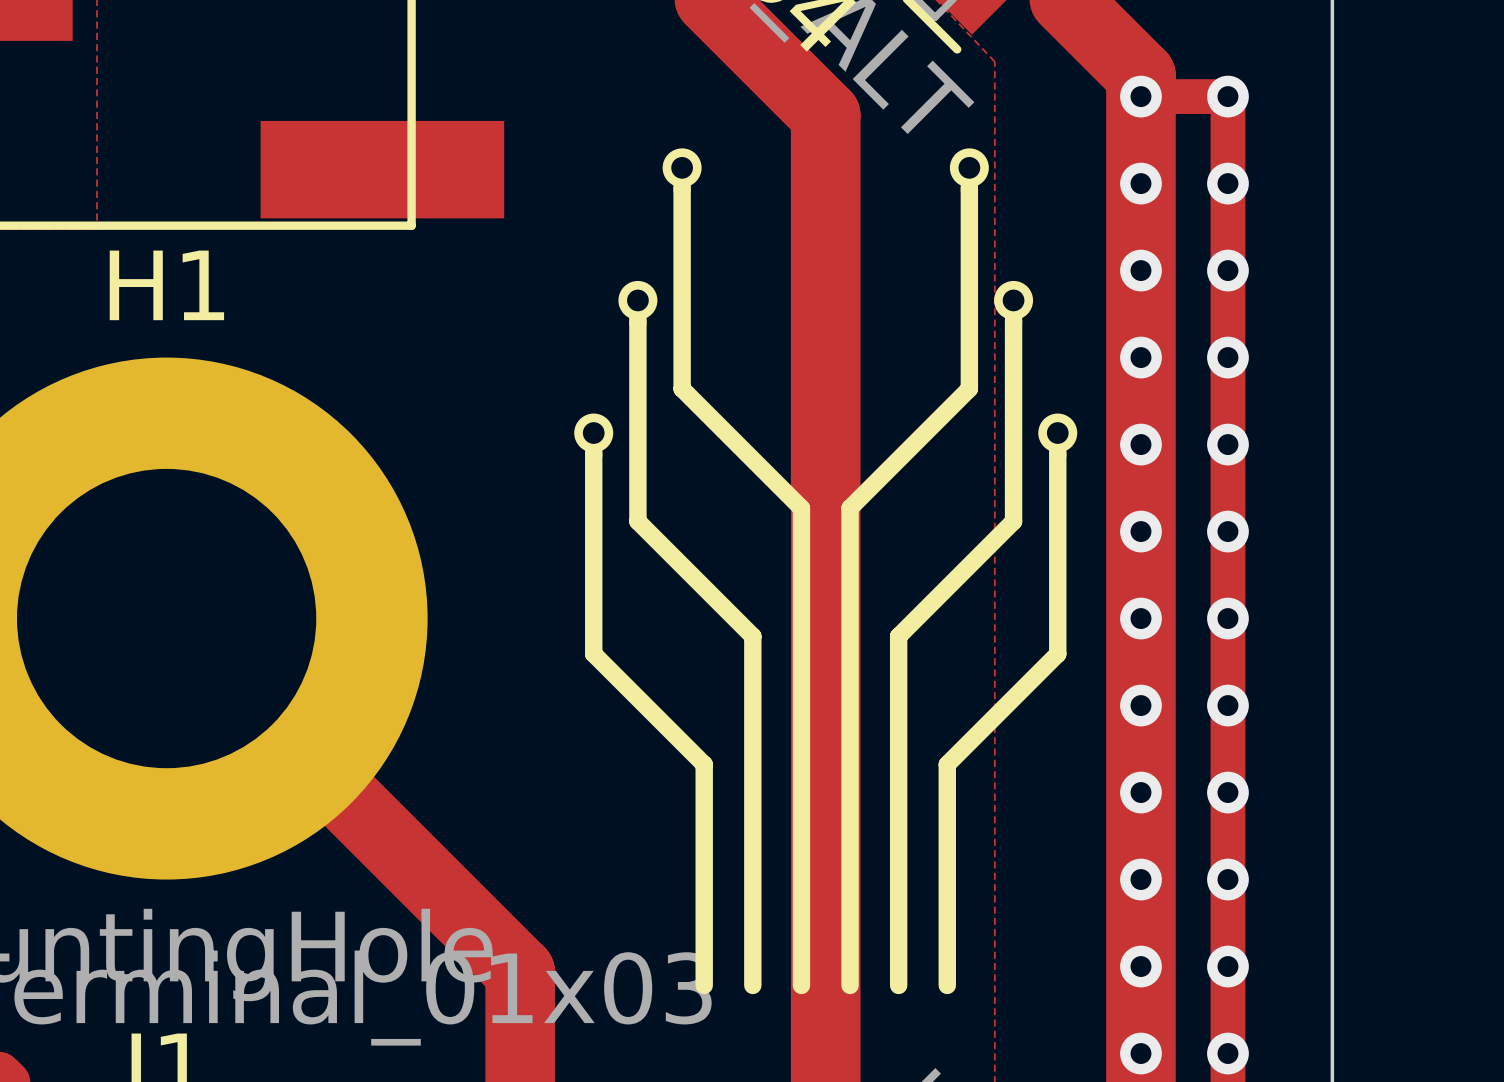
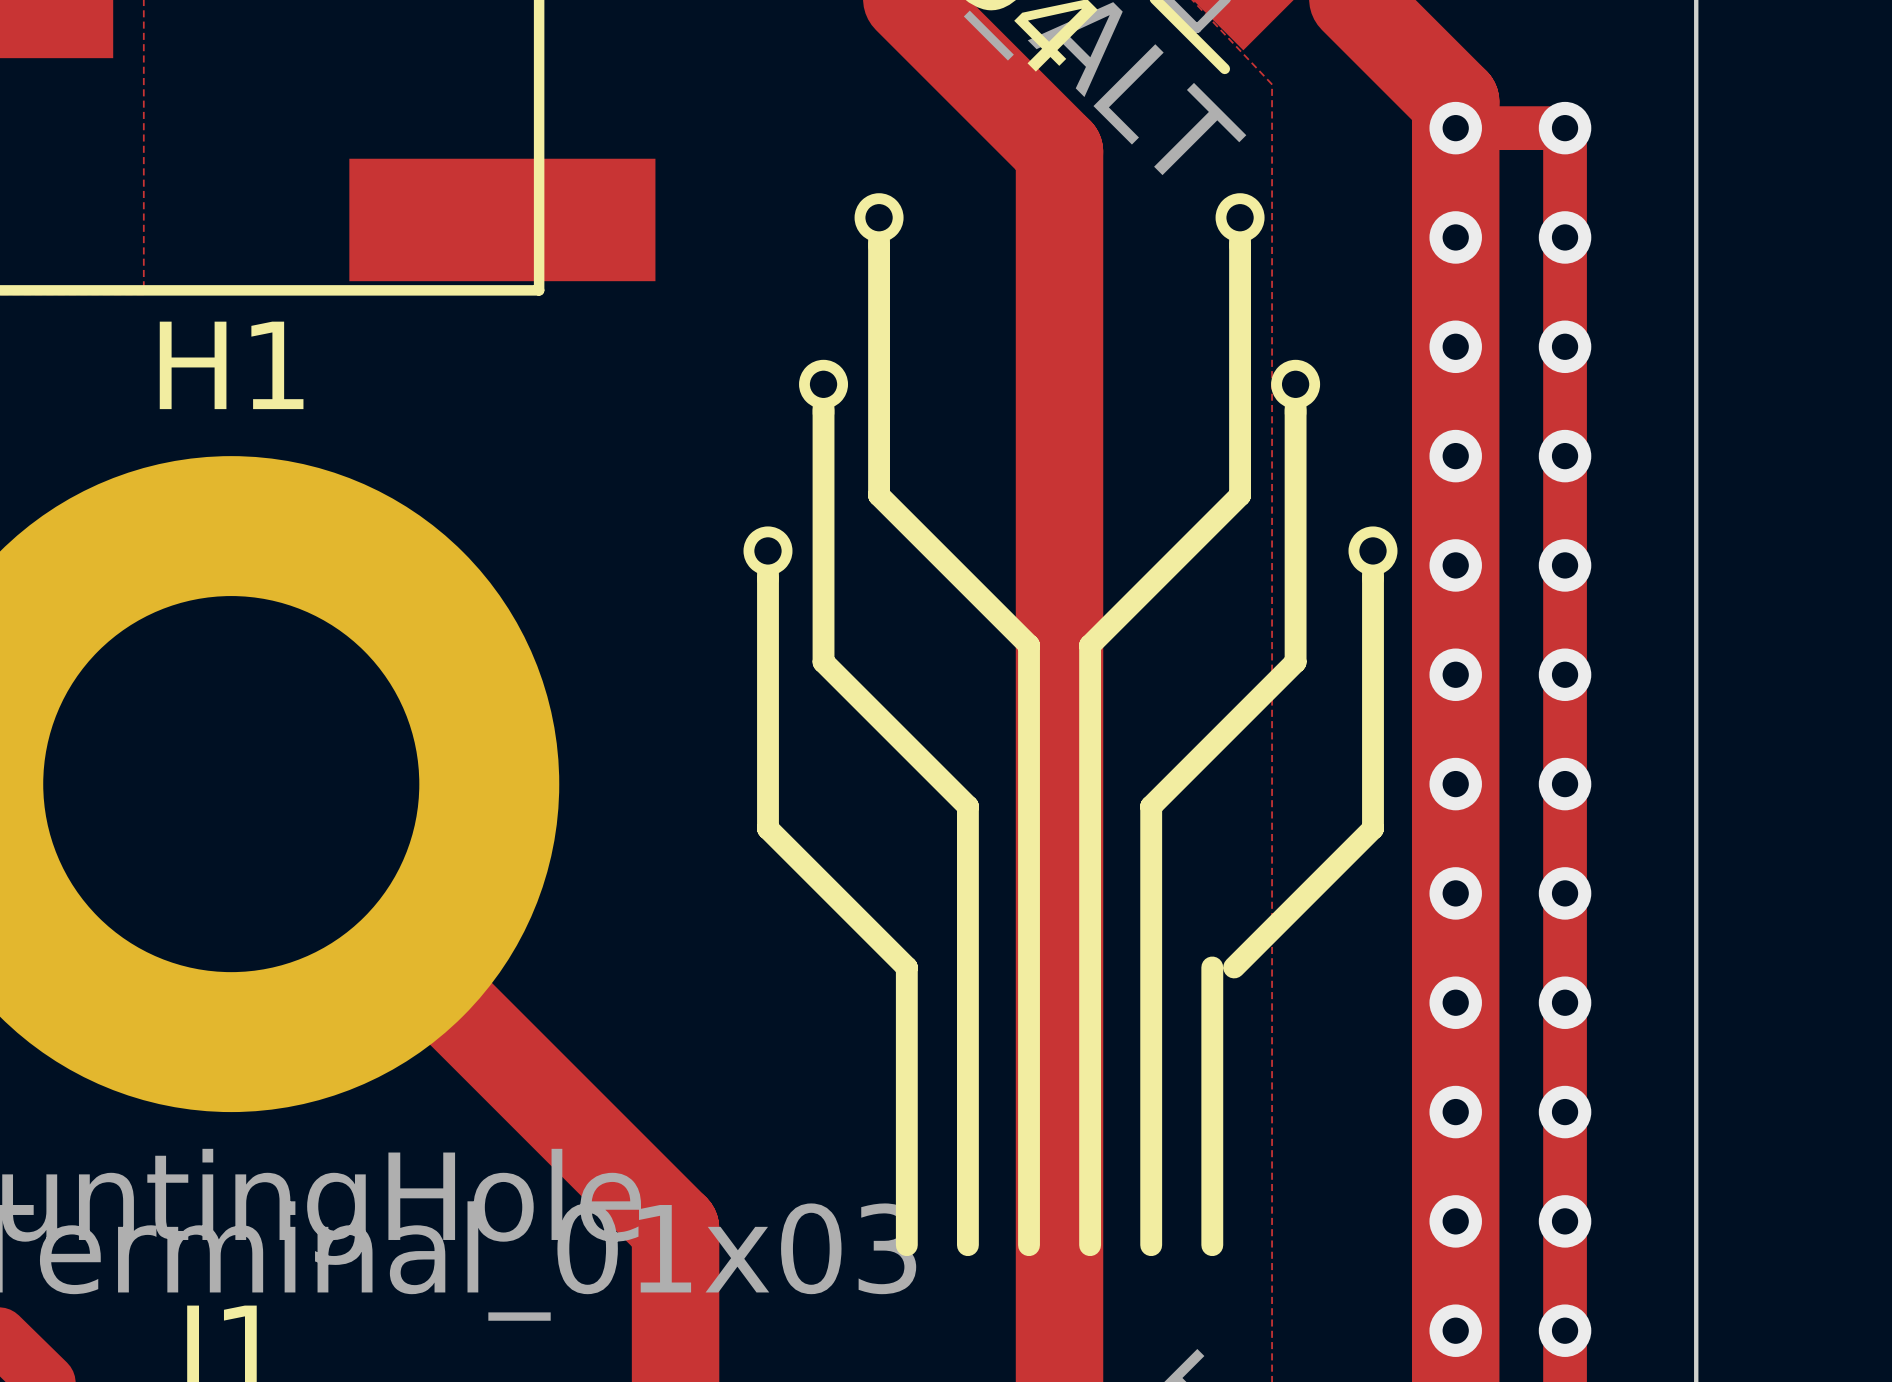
drawing position: (1057, 433) -> (1373, 550)
line: (1057, 453) (1057, 653) (947, 764) -> (1373, 576) (1373, 828) (1234, 967)

